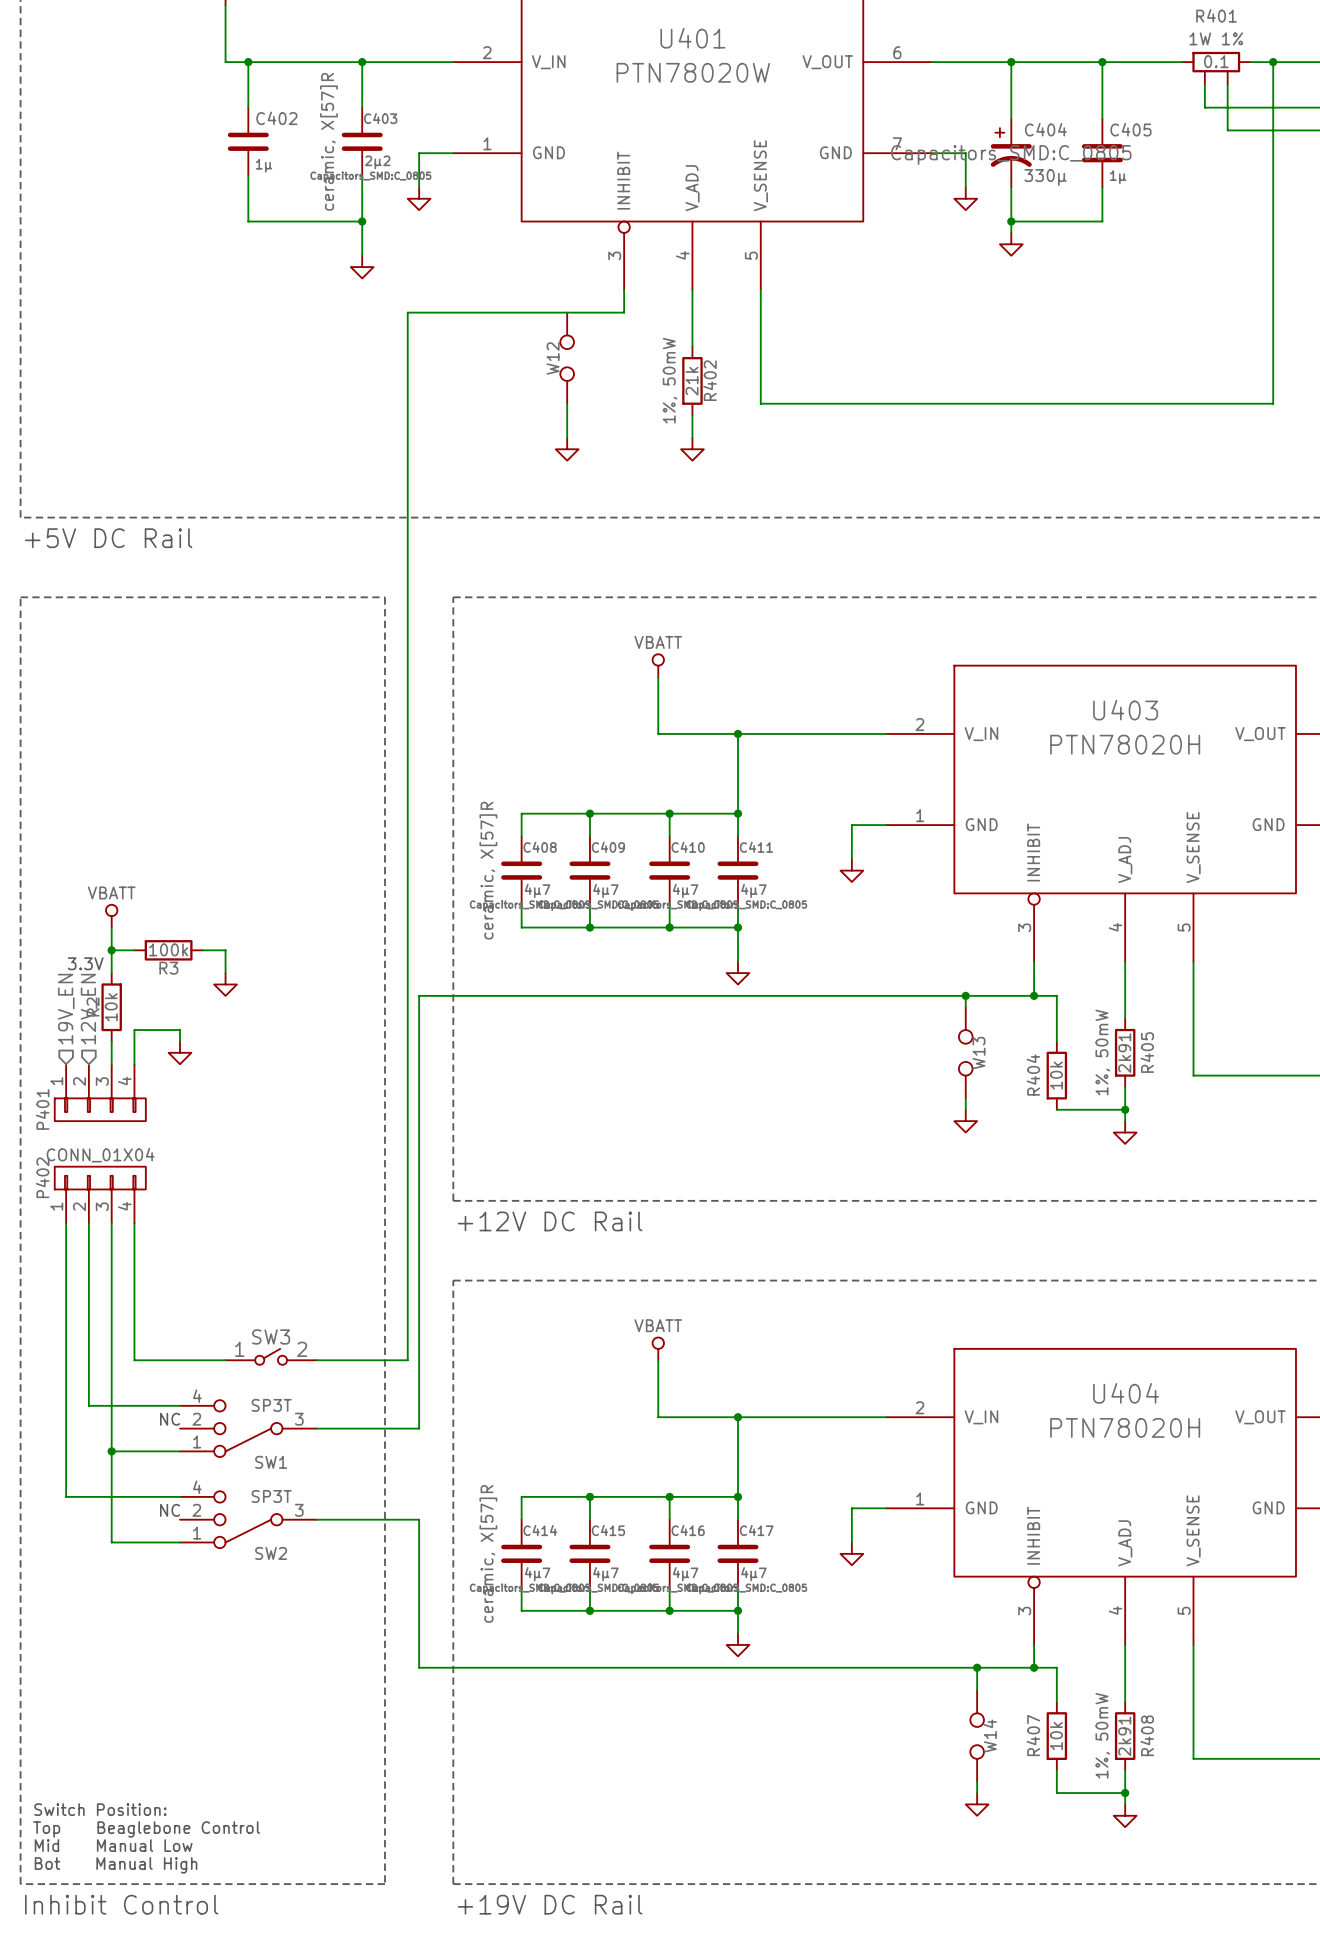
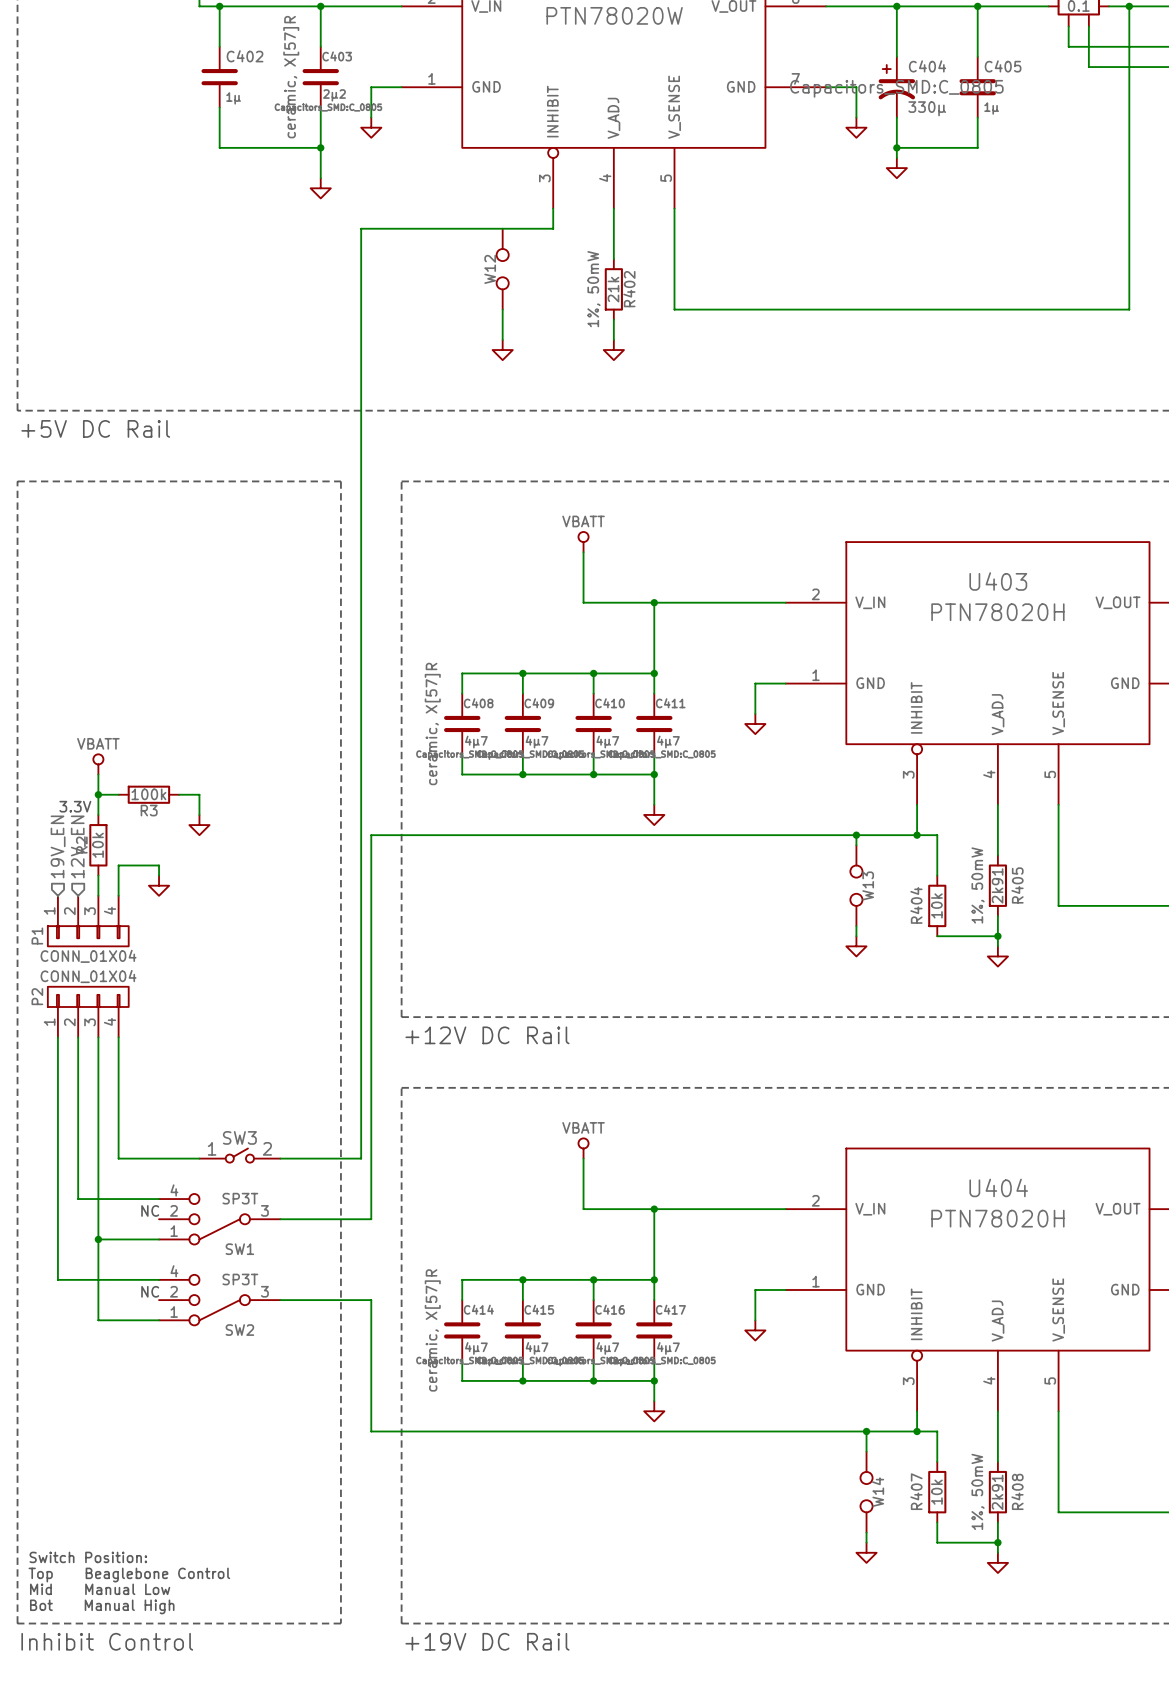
P401 name: P401 (42, 1109) -> P1 (37, 936)
P401 value: none -> CONN_01X04 (88, 956)
P402 name: P402 (42, 1177) -> P2 (37, 996)

